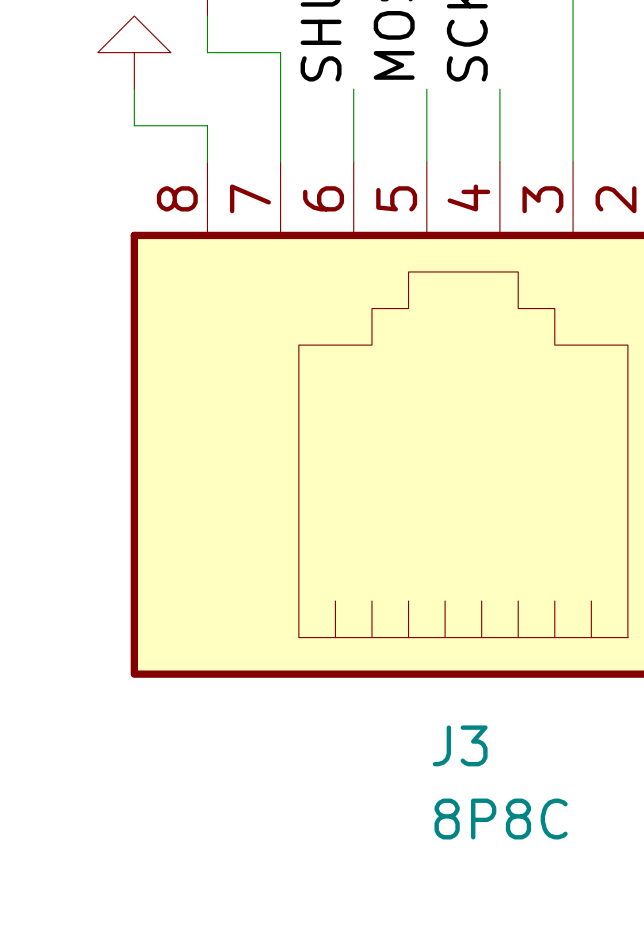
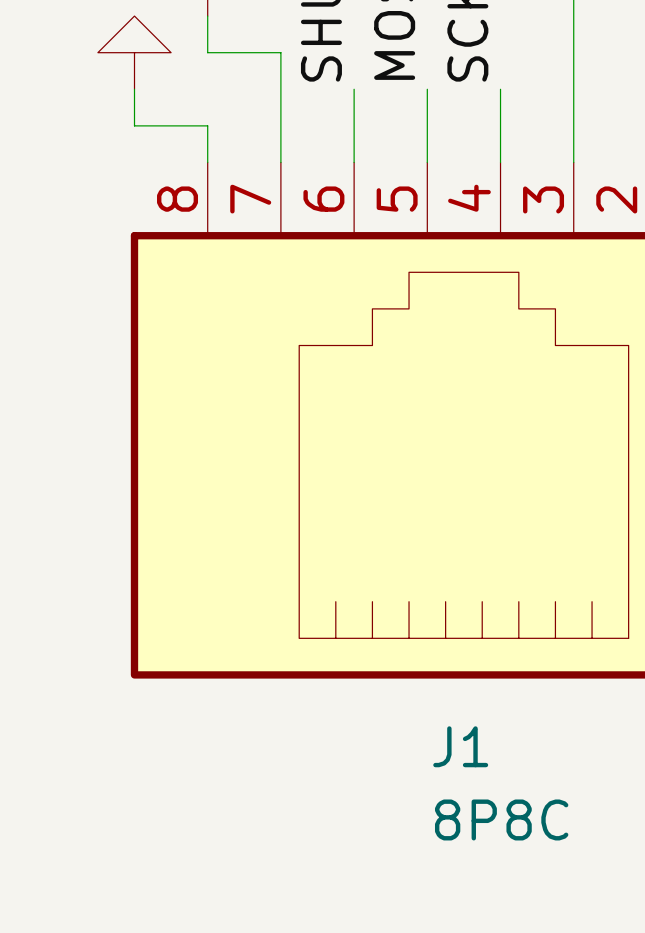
J3 name: J3 (460, 745) -> J1 (460, 746)

